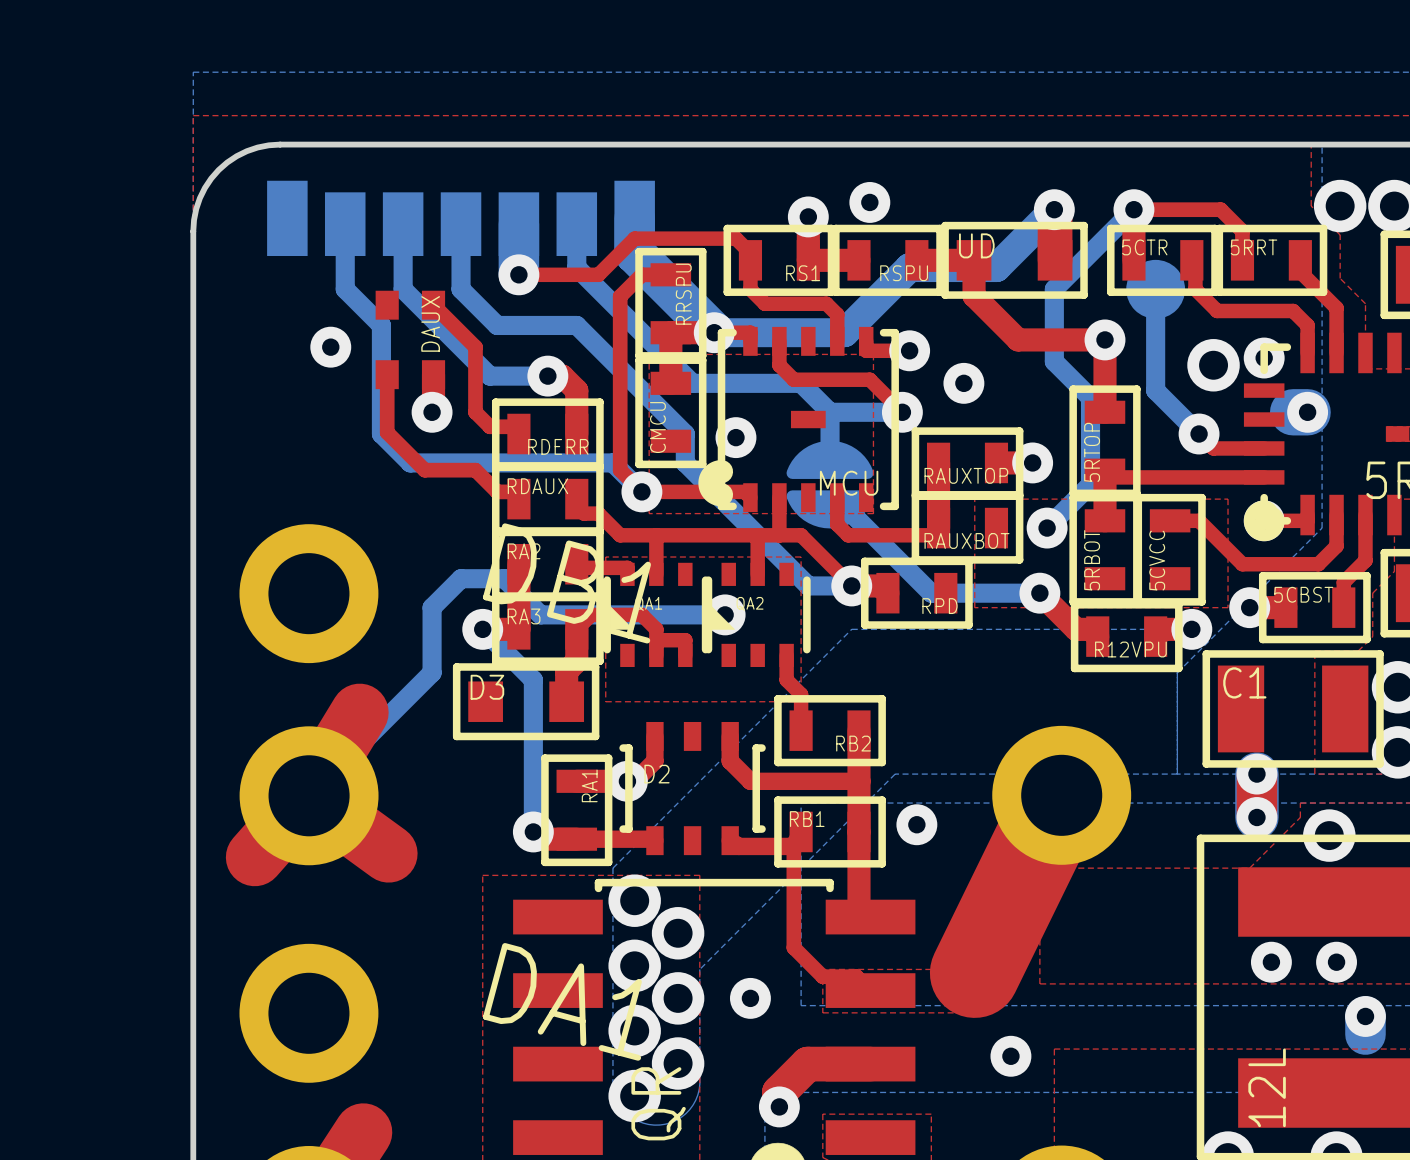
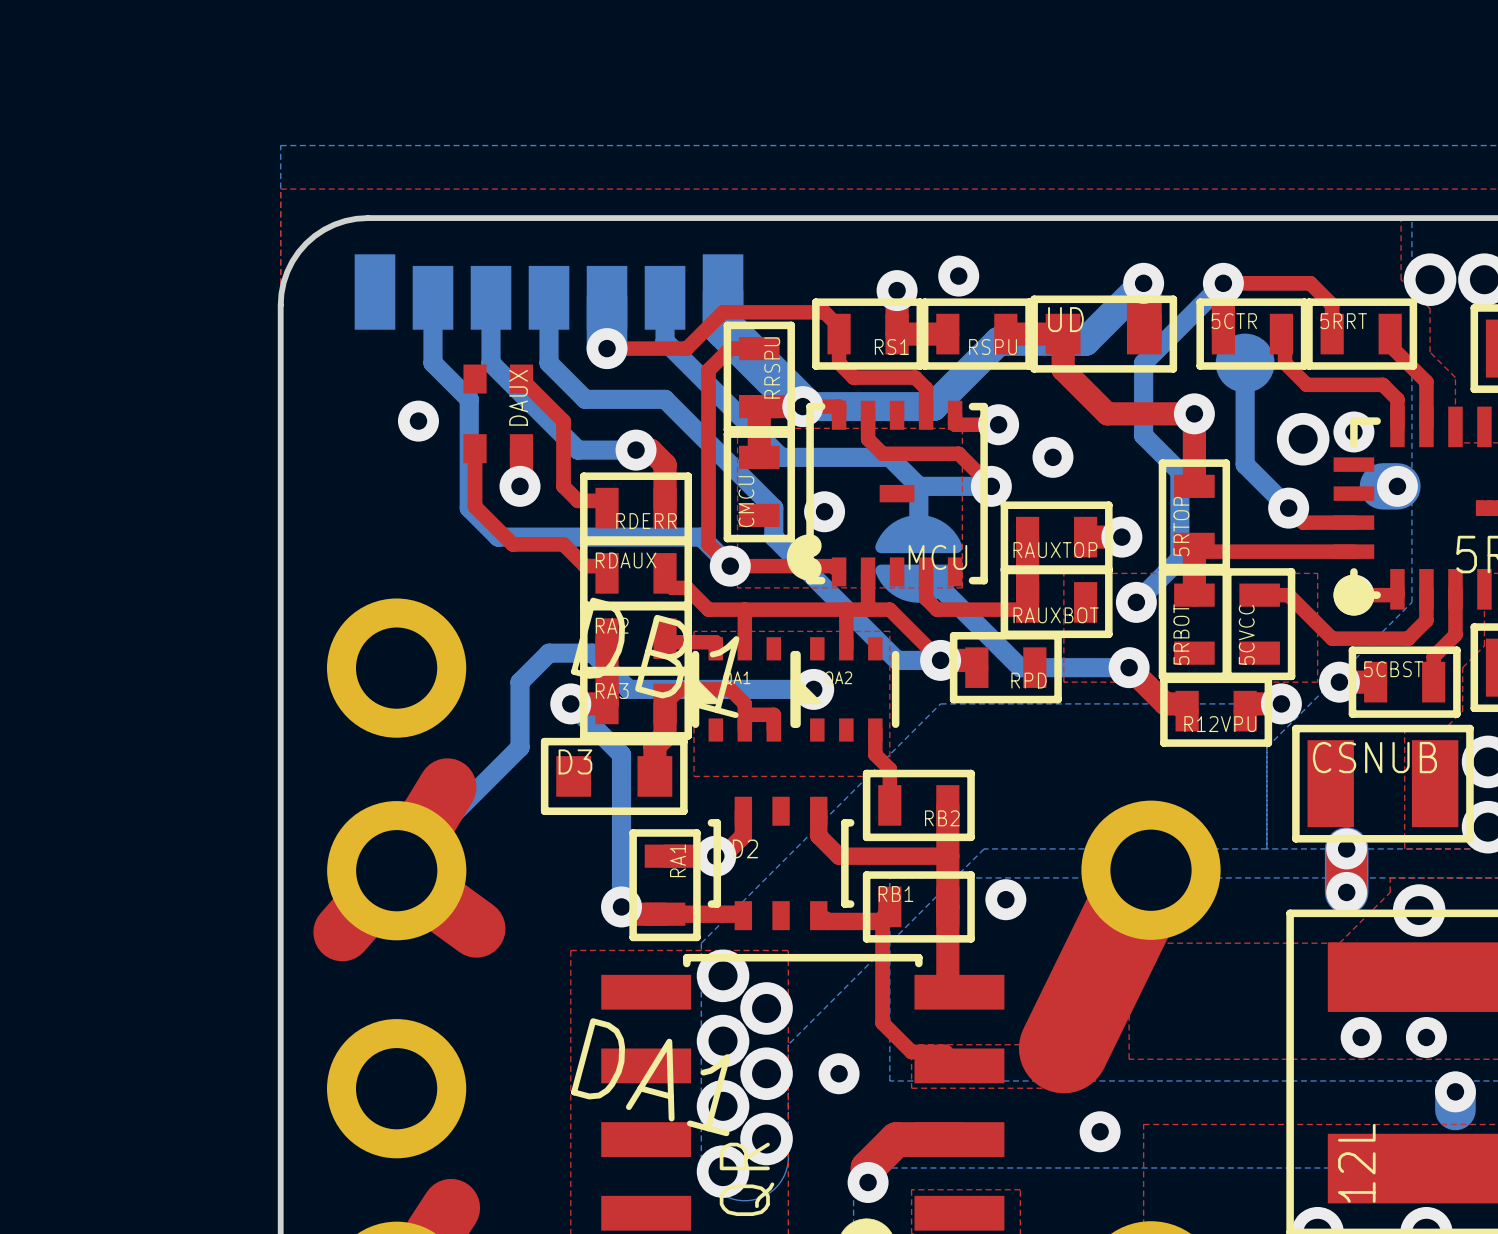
C1 name: C1 (1244, 682) -> CSNUB (1374, 757)

